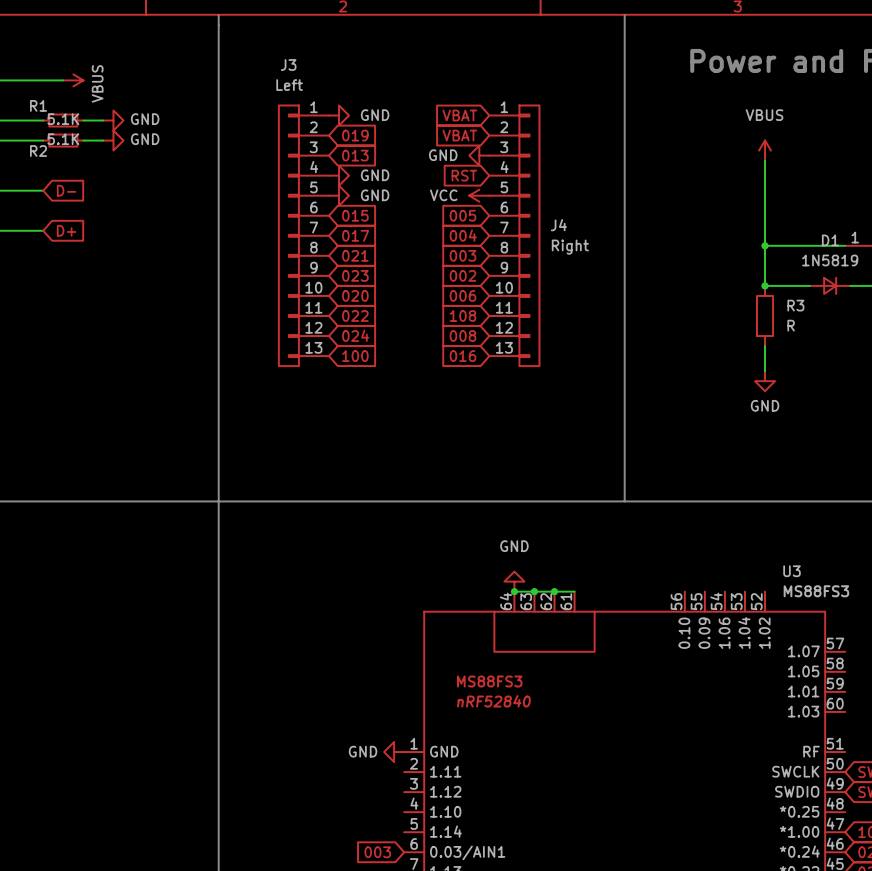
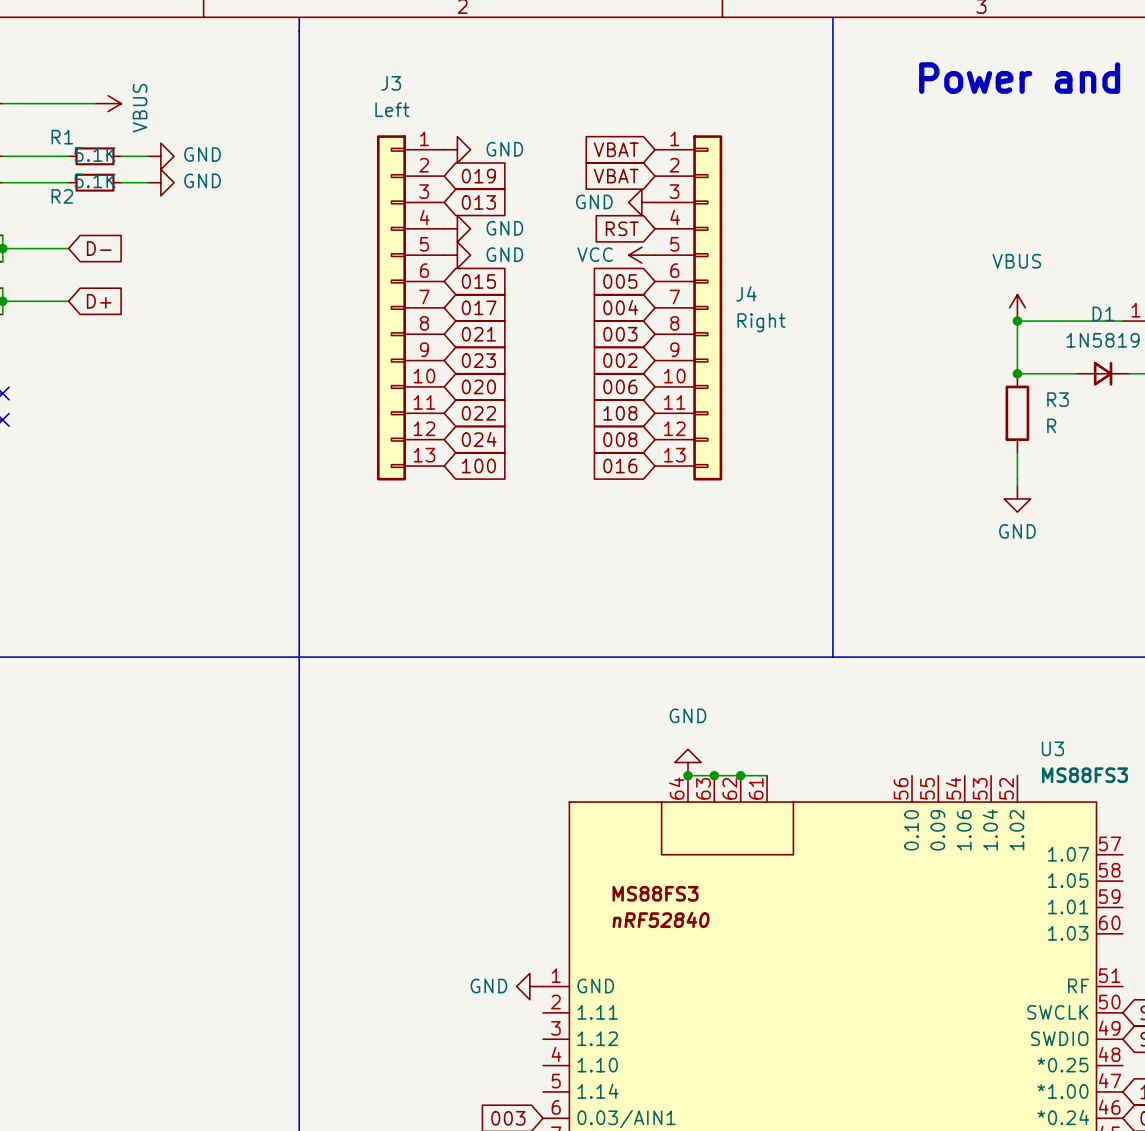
power symbol position: VBUS (765, 150) -> VBUS (1017, 307)
wire: (765, 160) (765, 245) -> none

